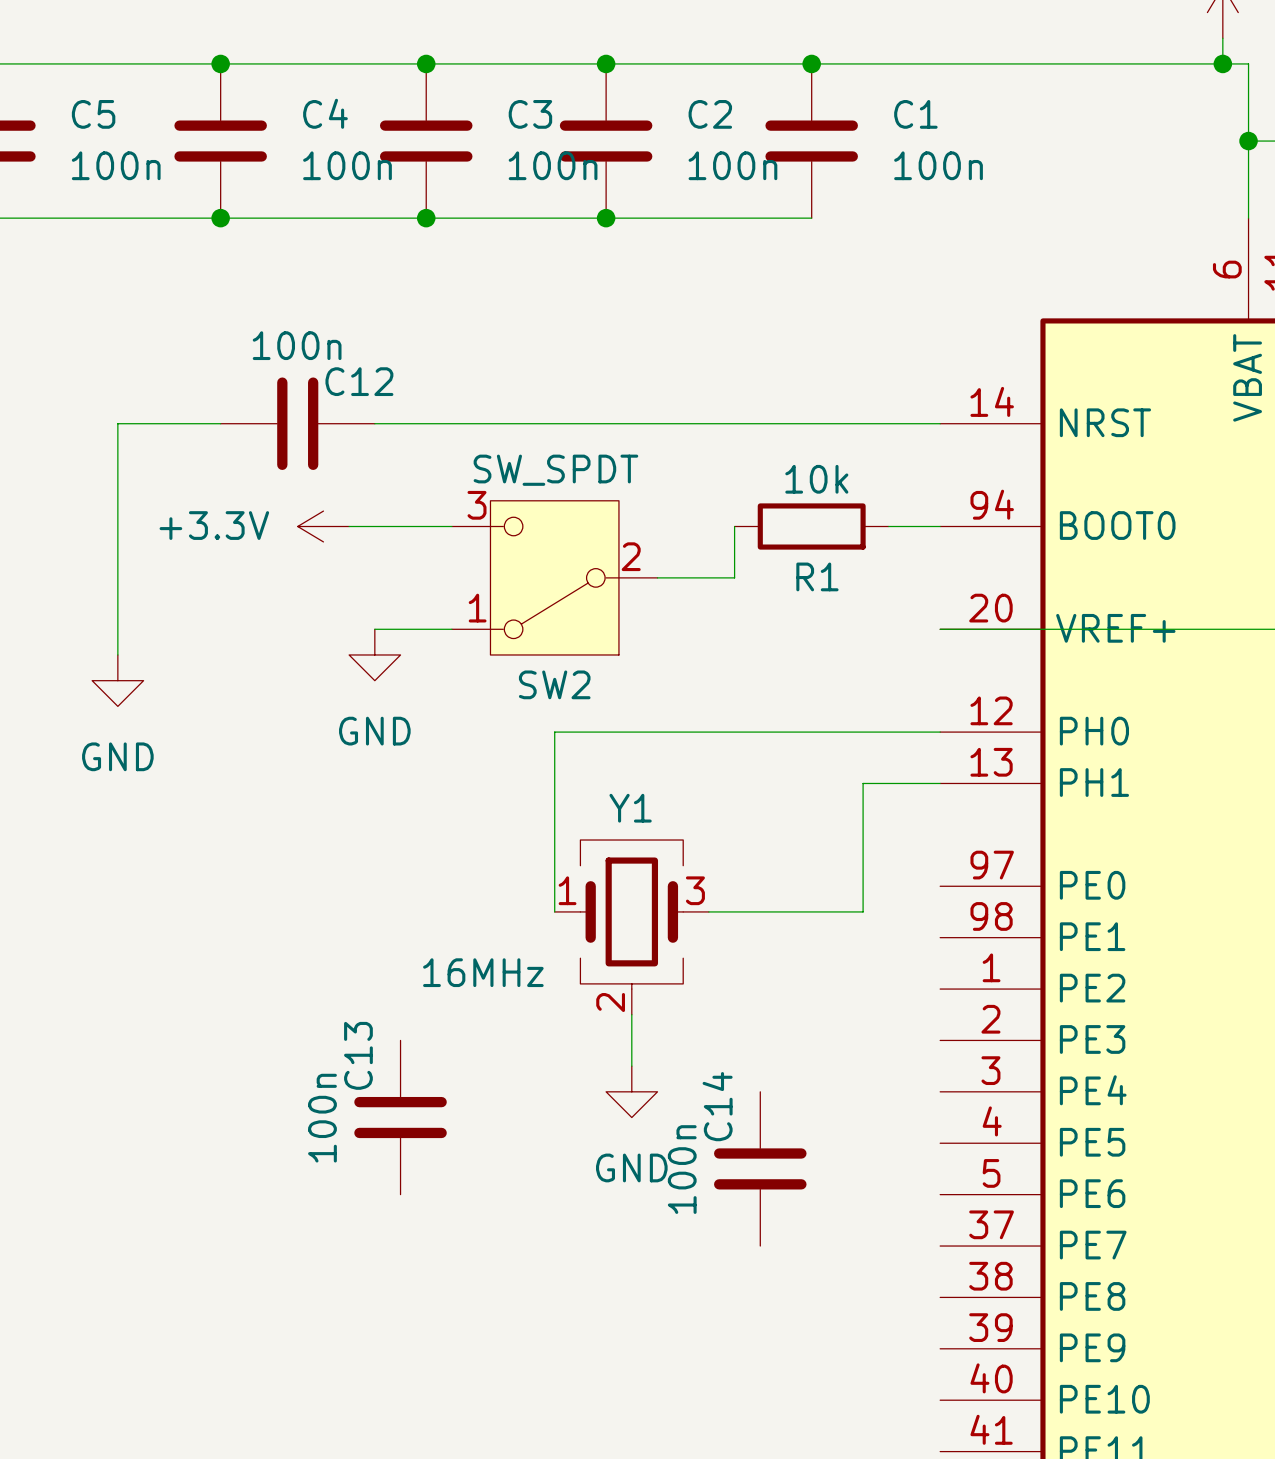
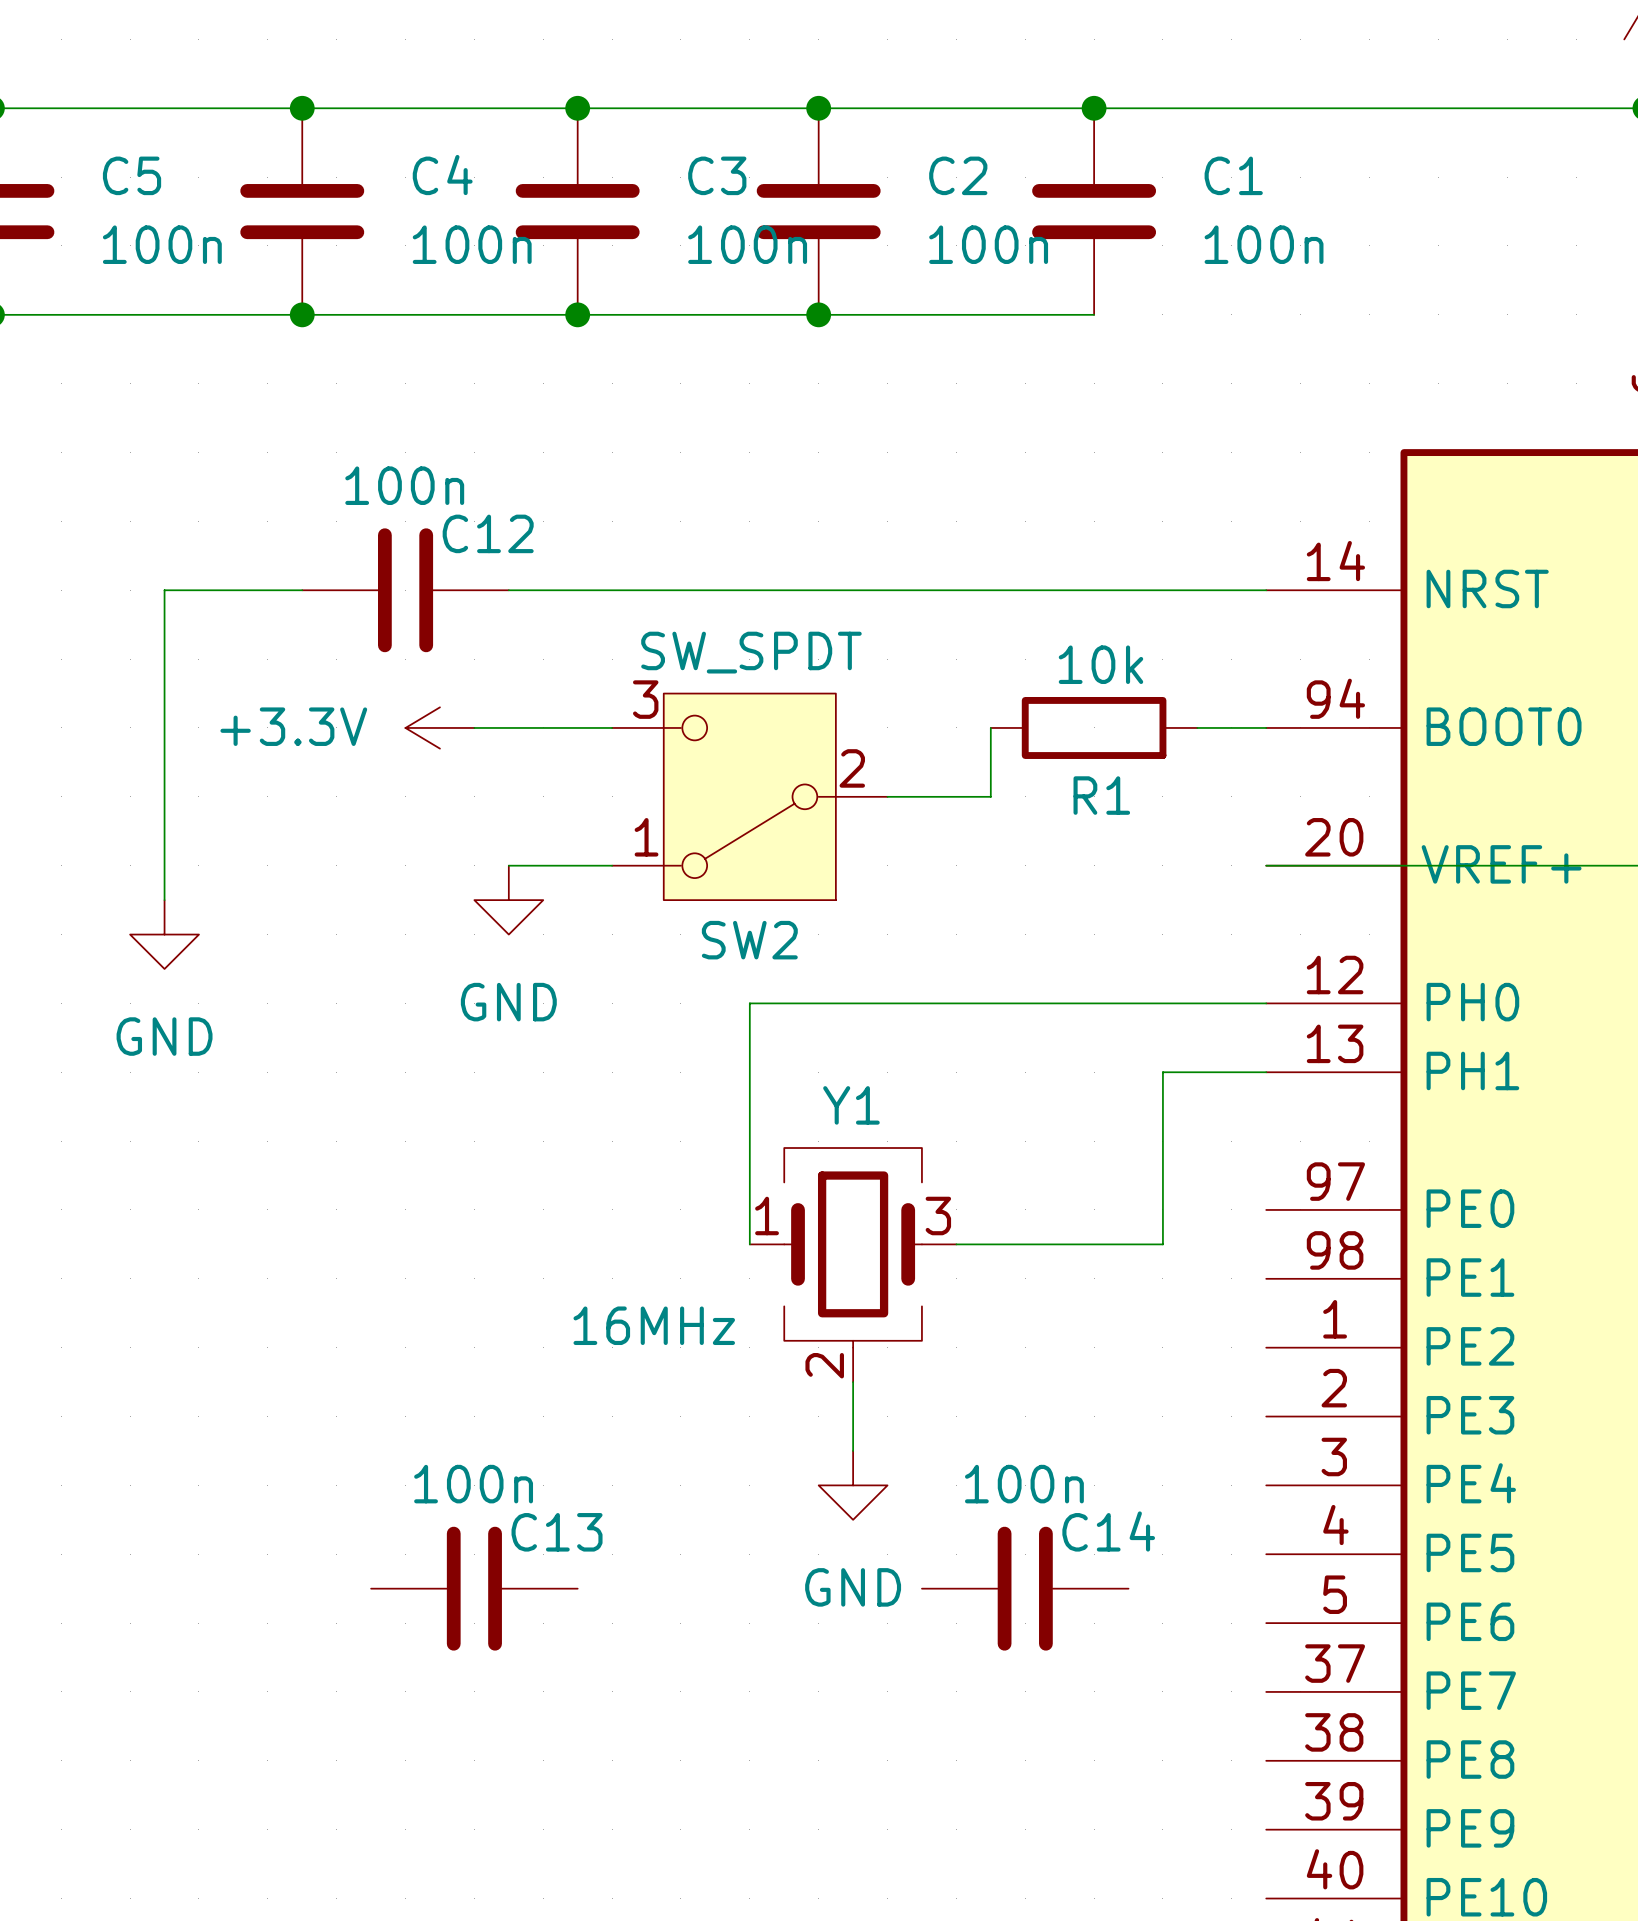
C13 rotation: 0° (400, 1117) -> 90° clockwise (474, 1588)
C14 rotation: 0° (760, 1168) -> 90° clockwise (1025, 1588)

